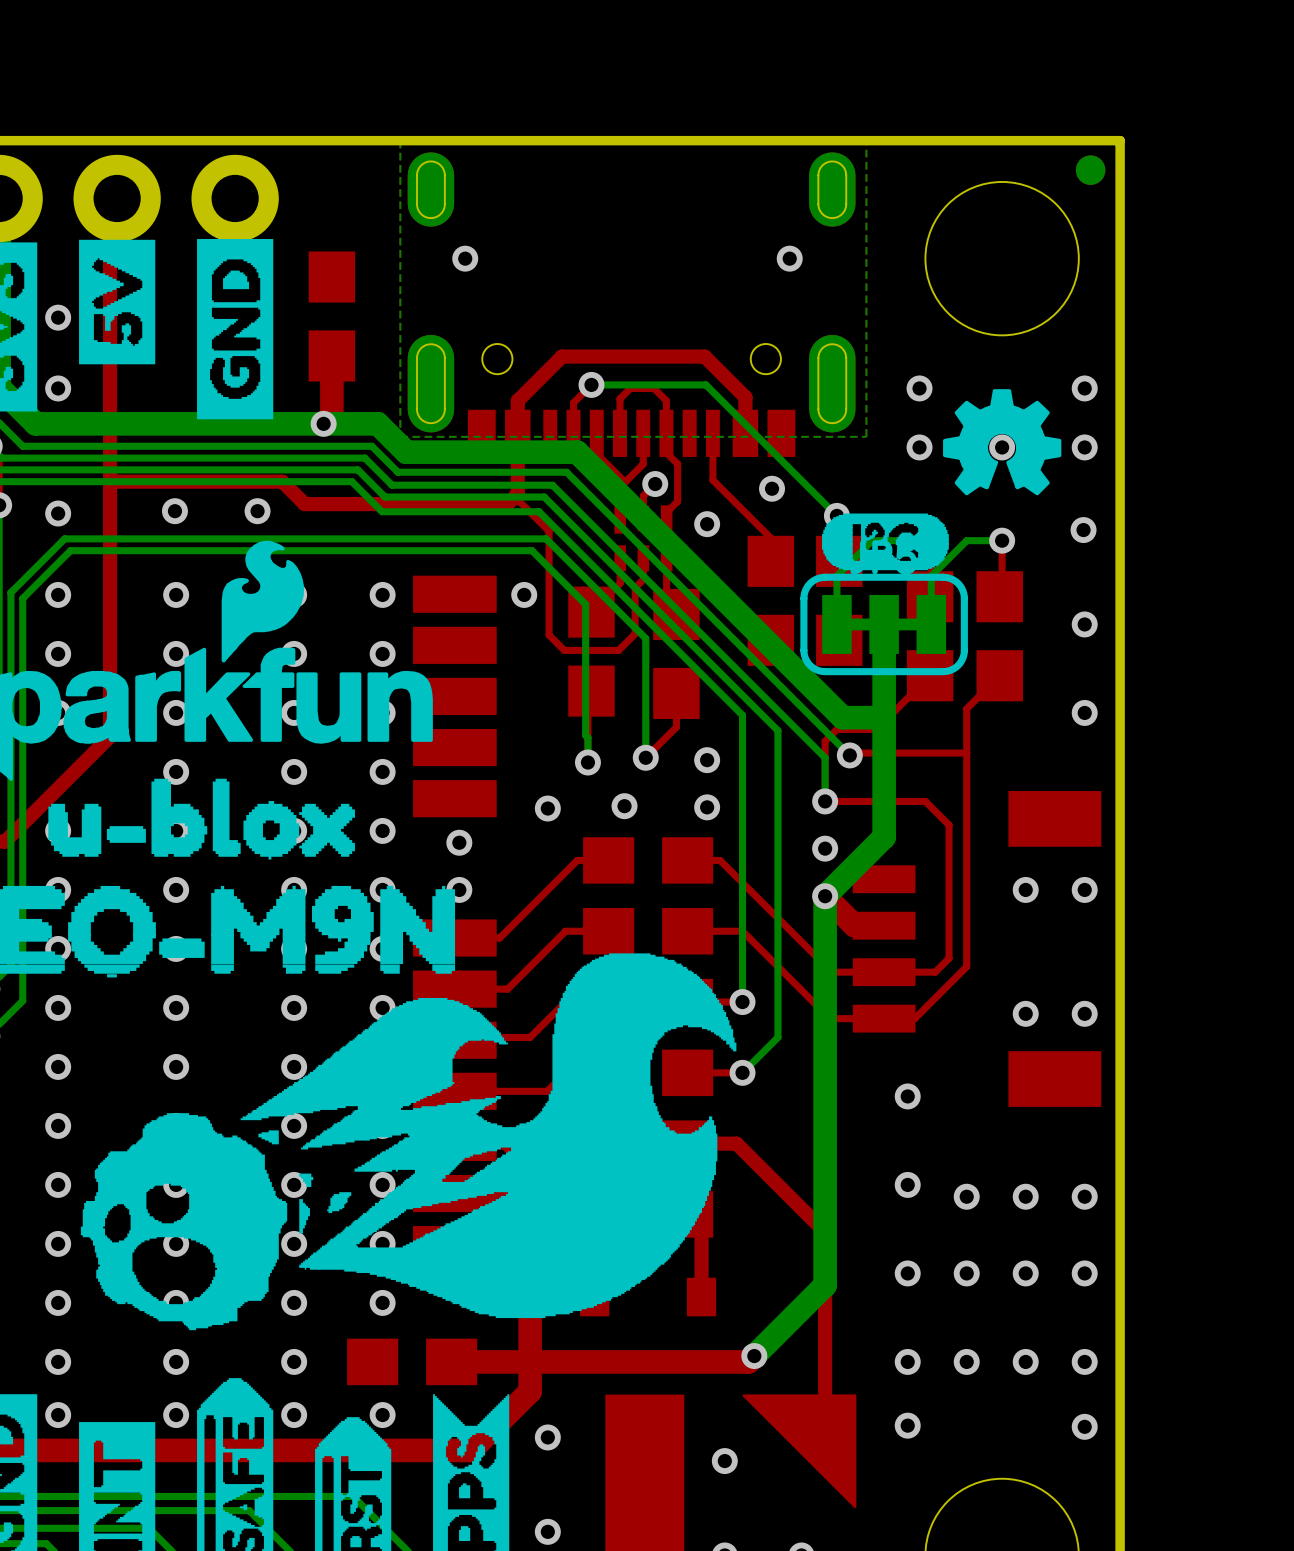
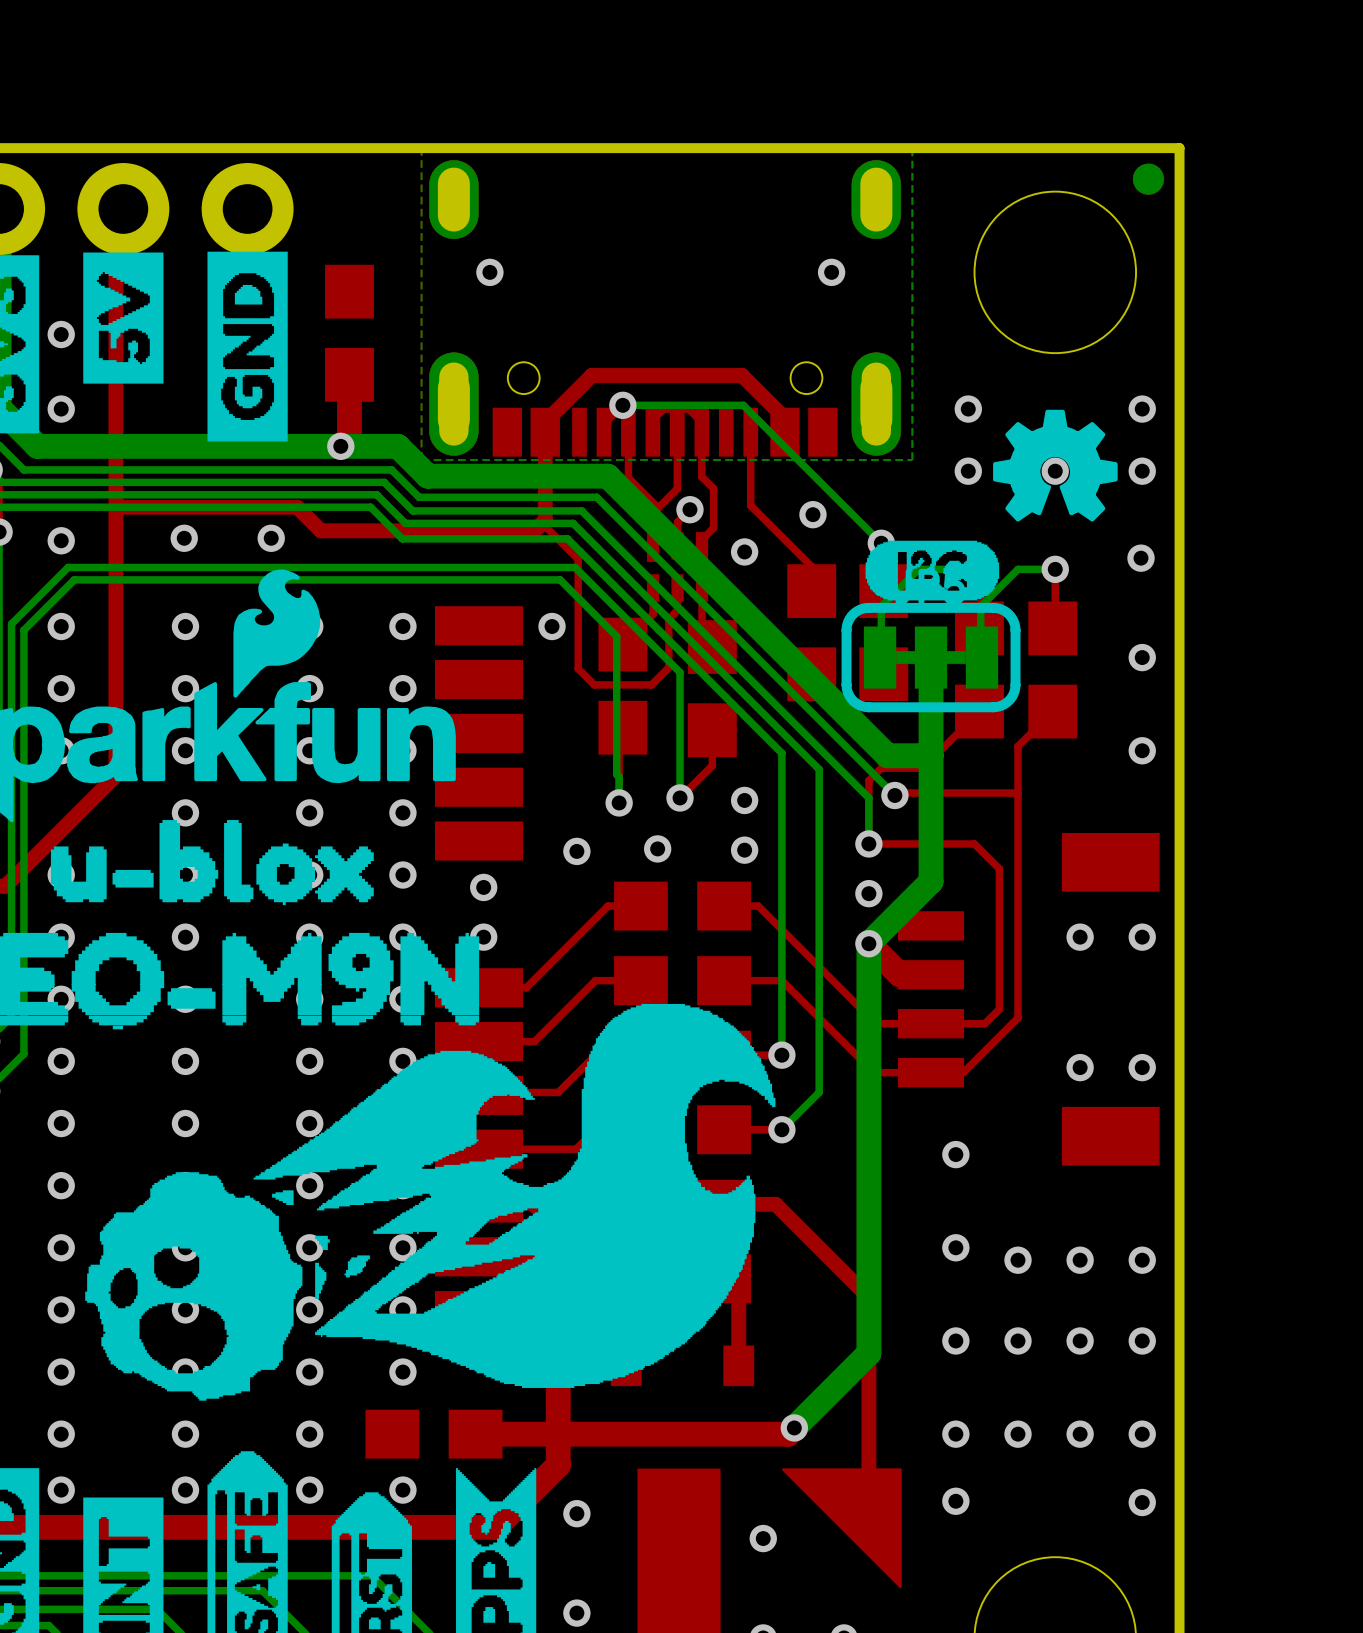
part footprint: [407, 152, 856, 457] -> [429, 160, 902, 457]
part footprint: [800, 573, 968, 676] -> [841, 602, 1021, 713]

